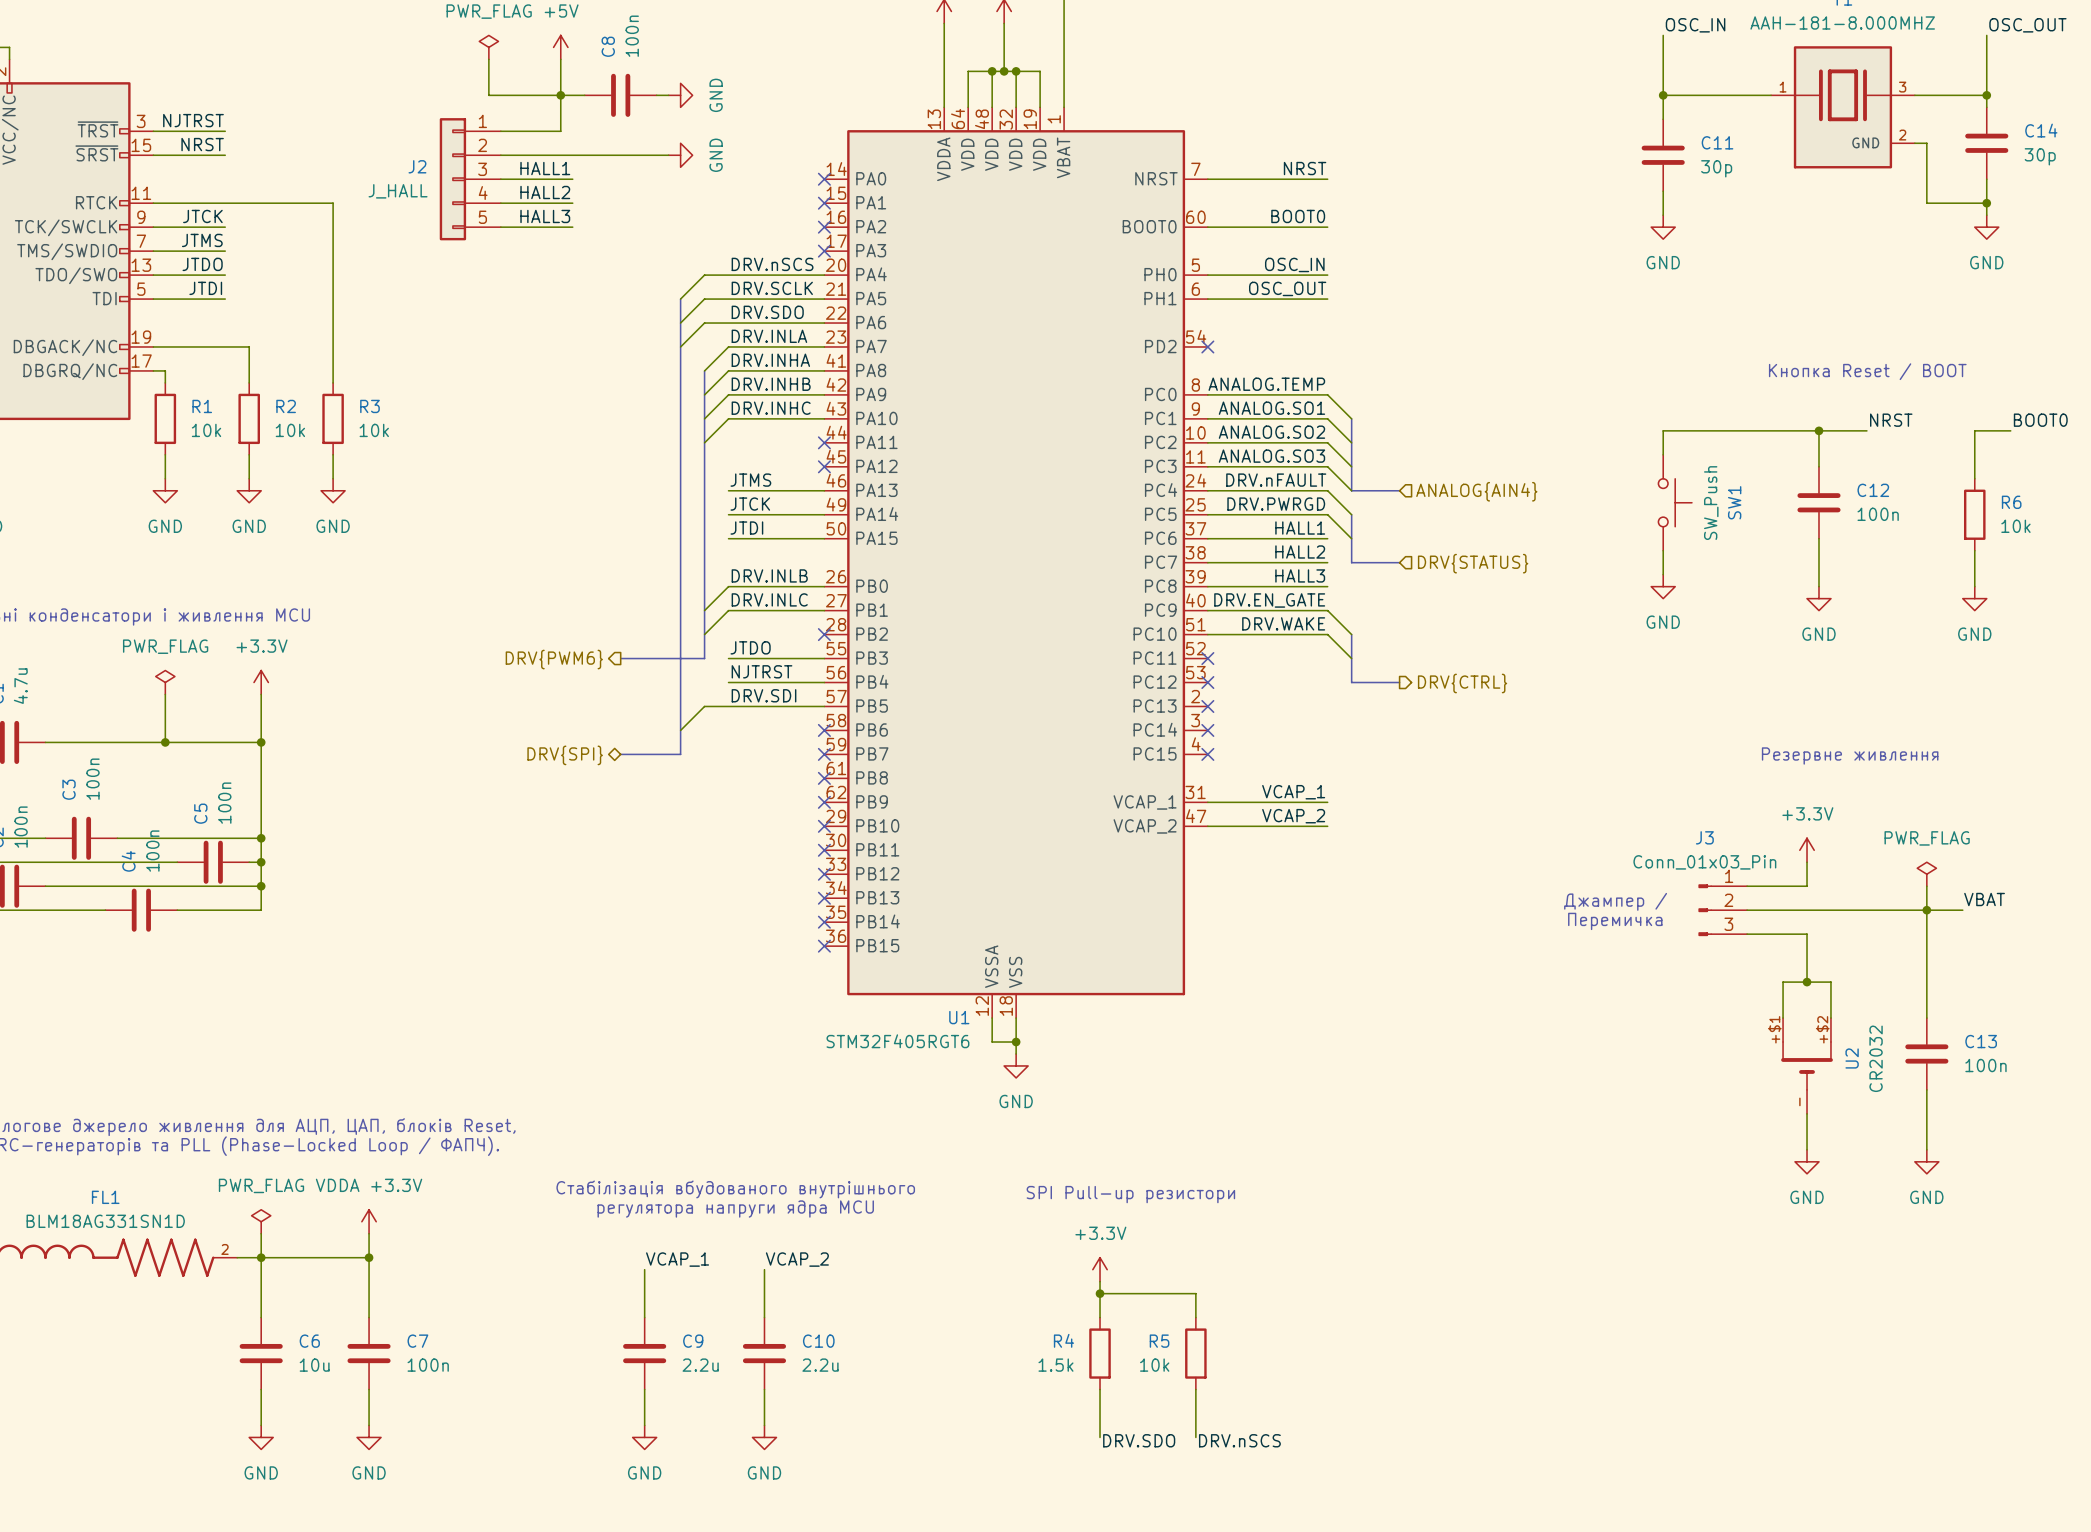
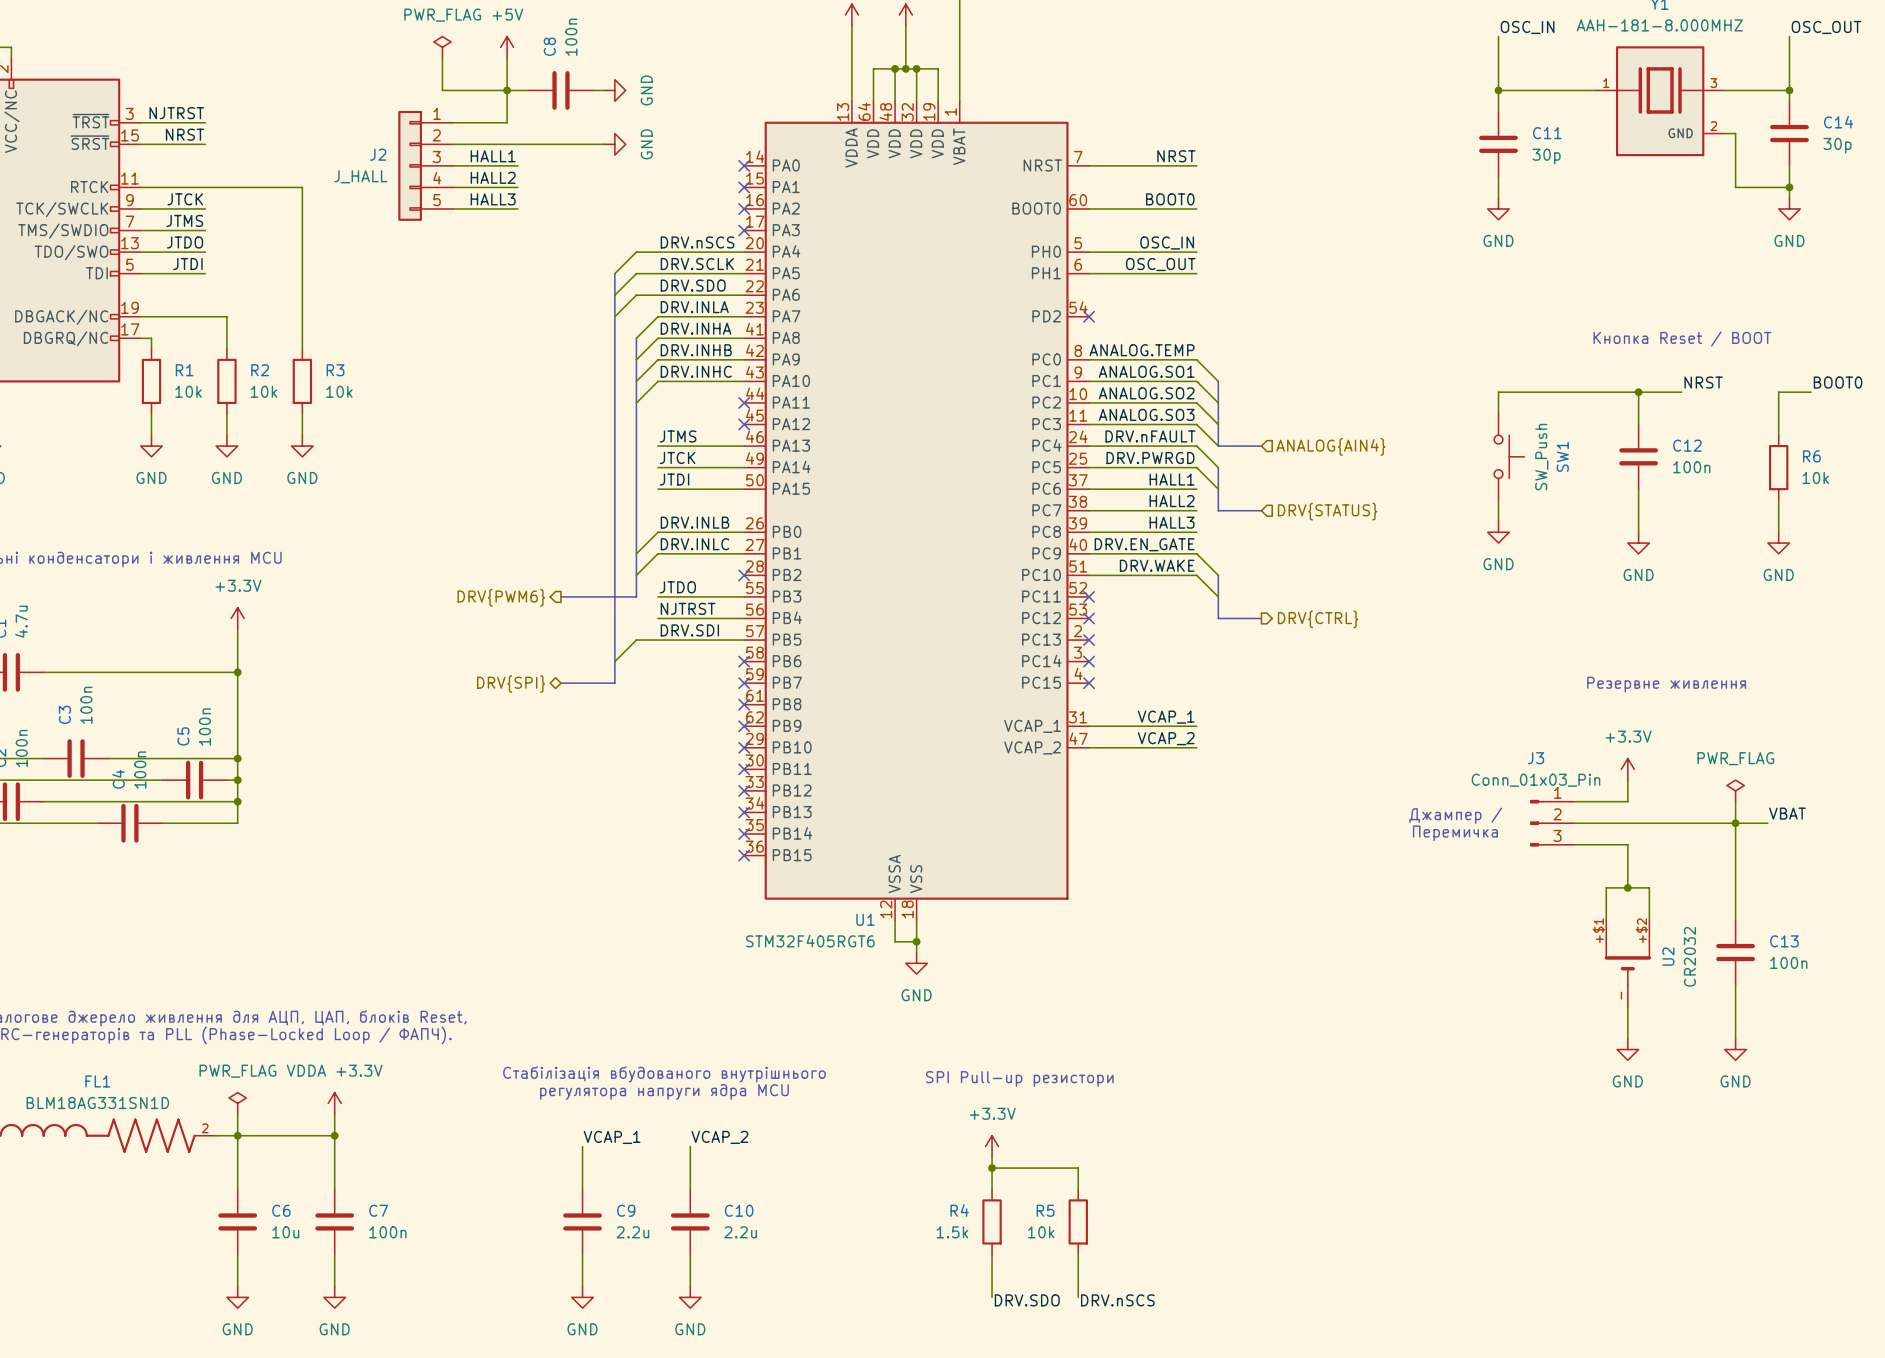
power symbol: PWR_FLAG (165, 682) -> none
wire: (165, 694) (165, 742) -> none
junction: (165, 742) -> none

